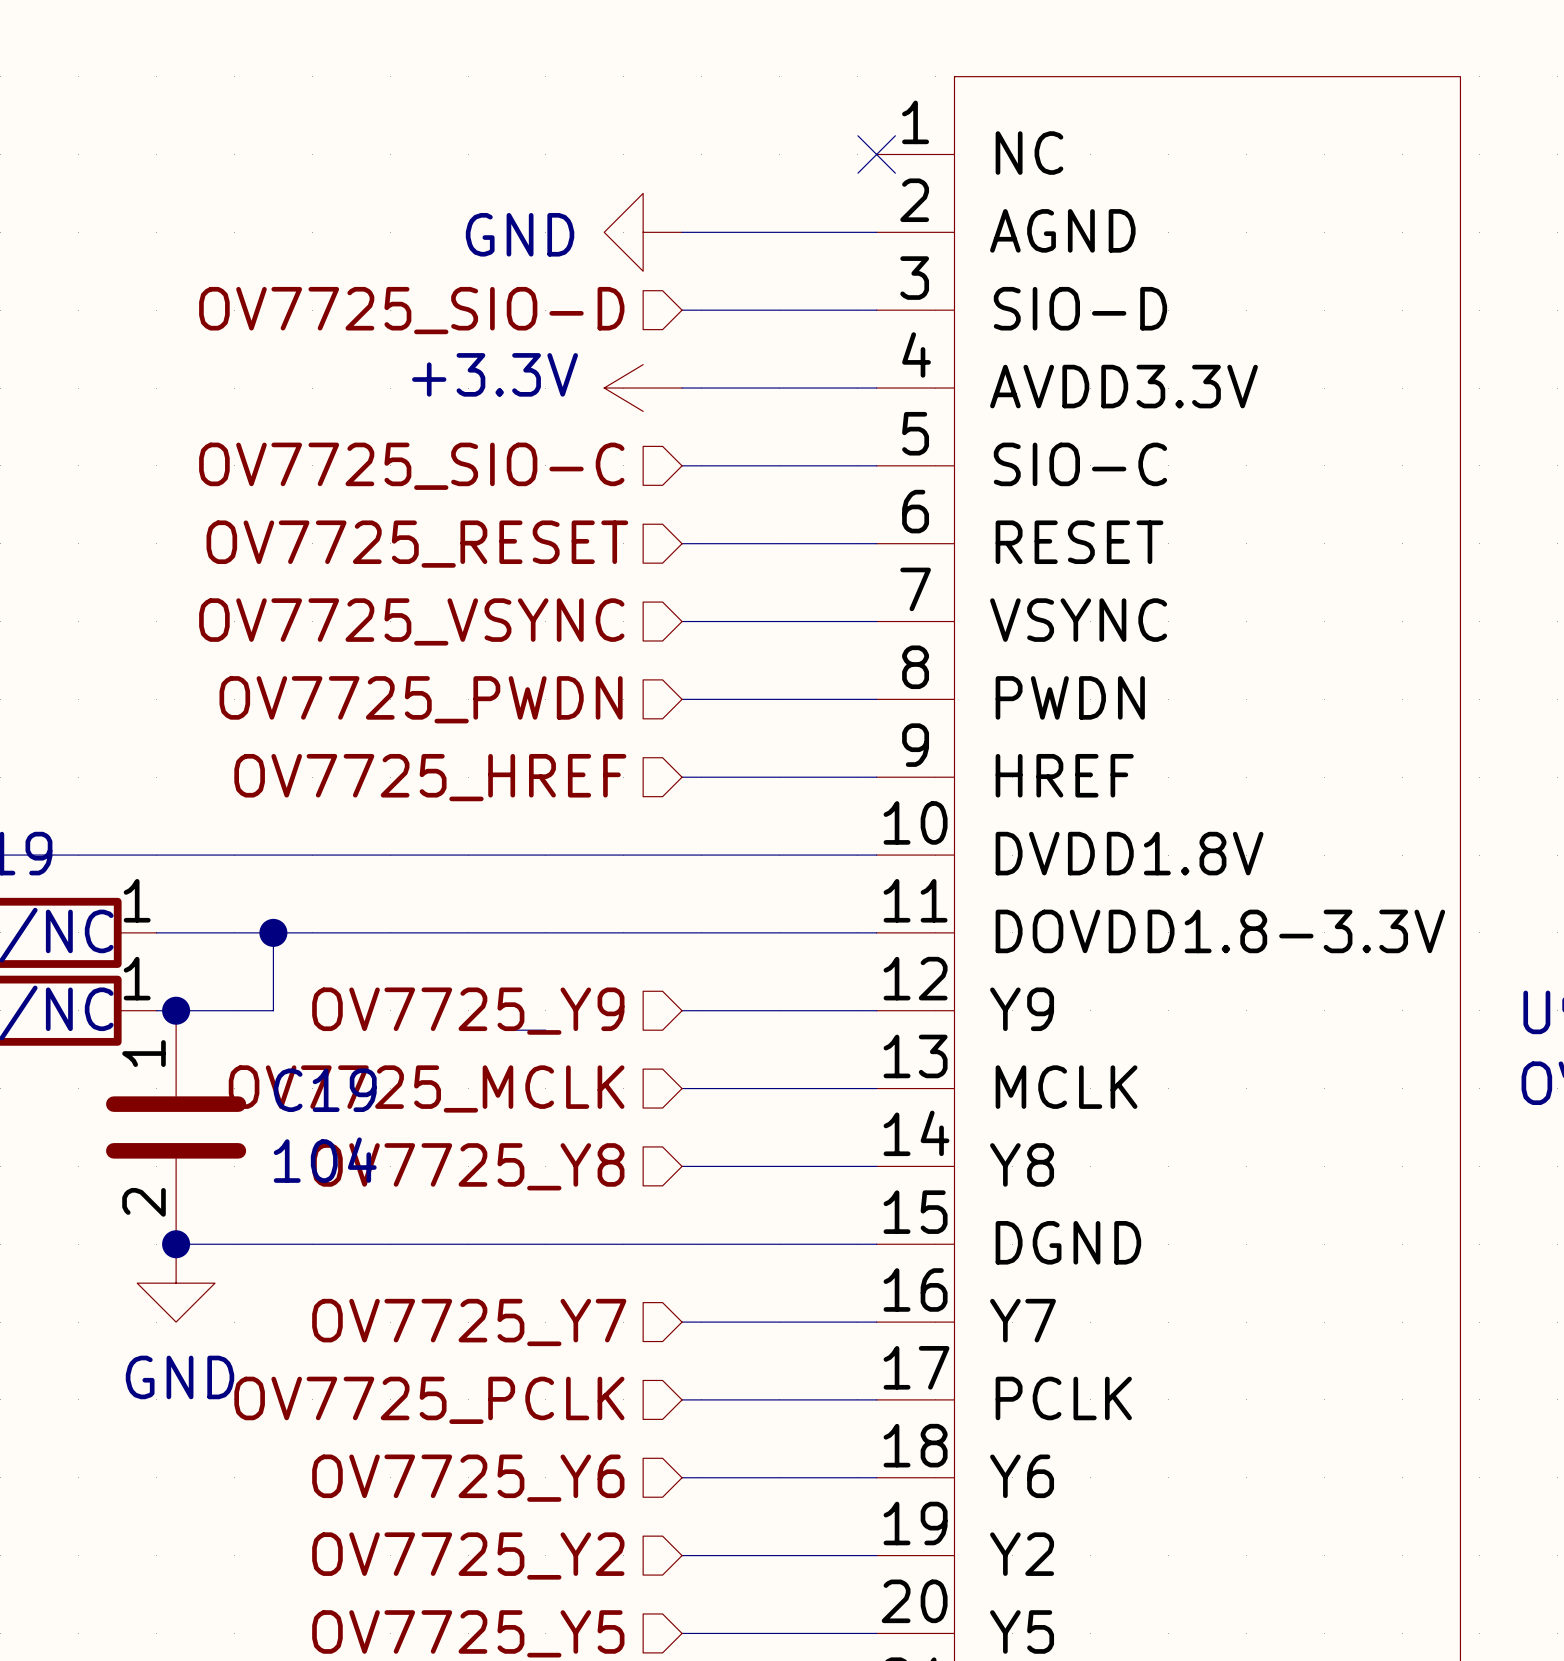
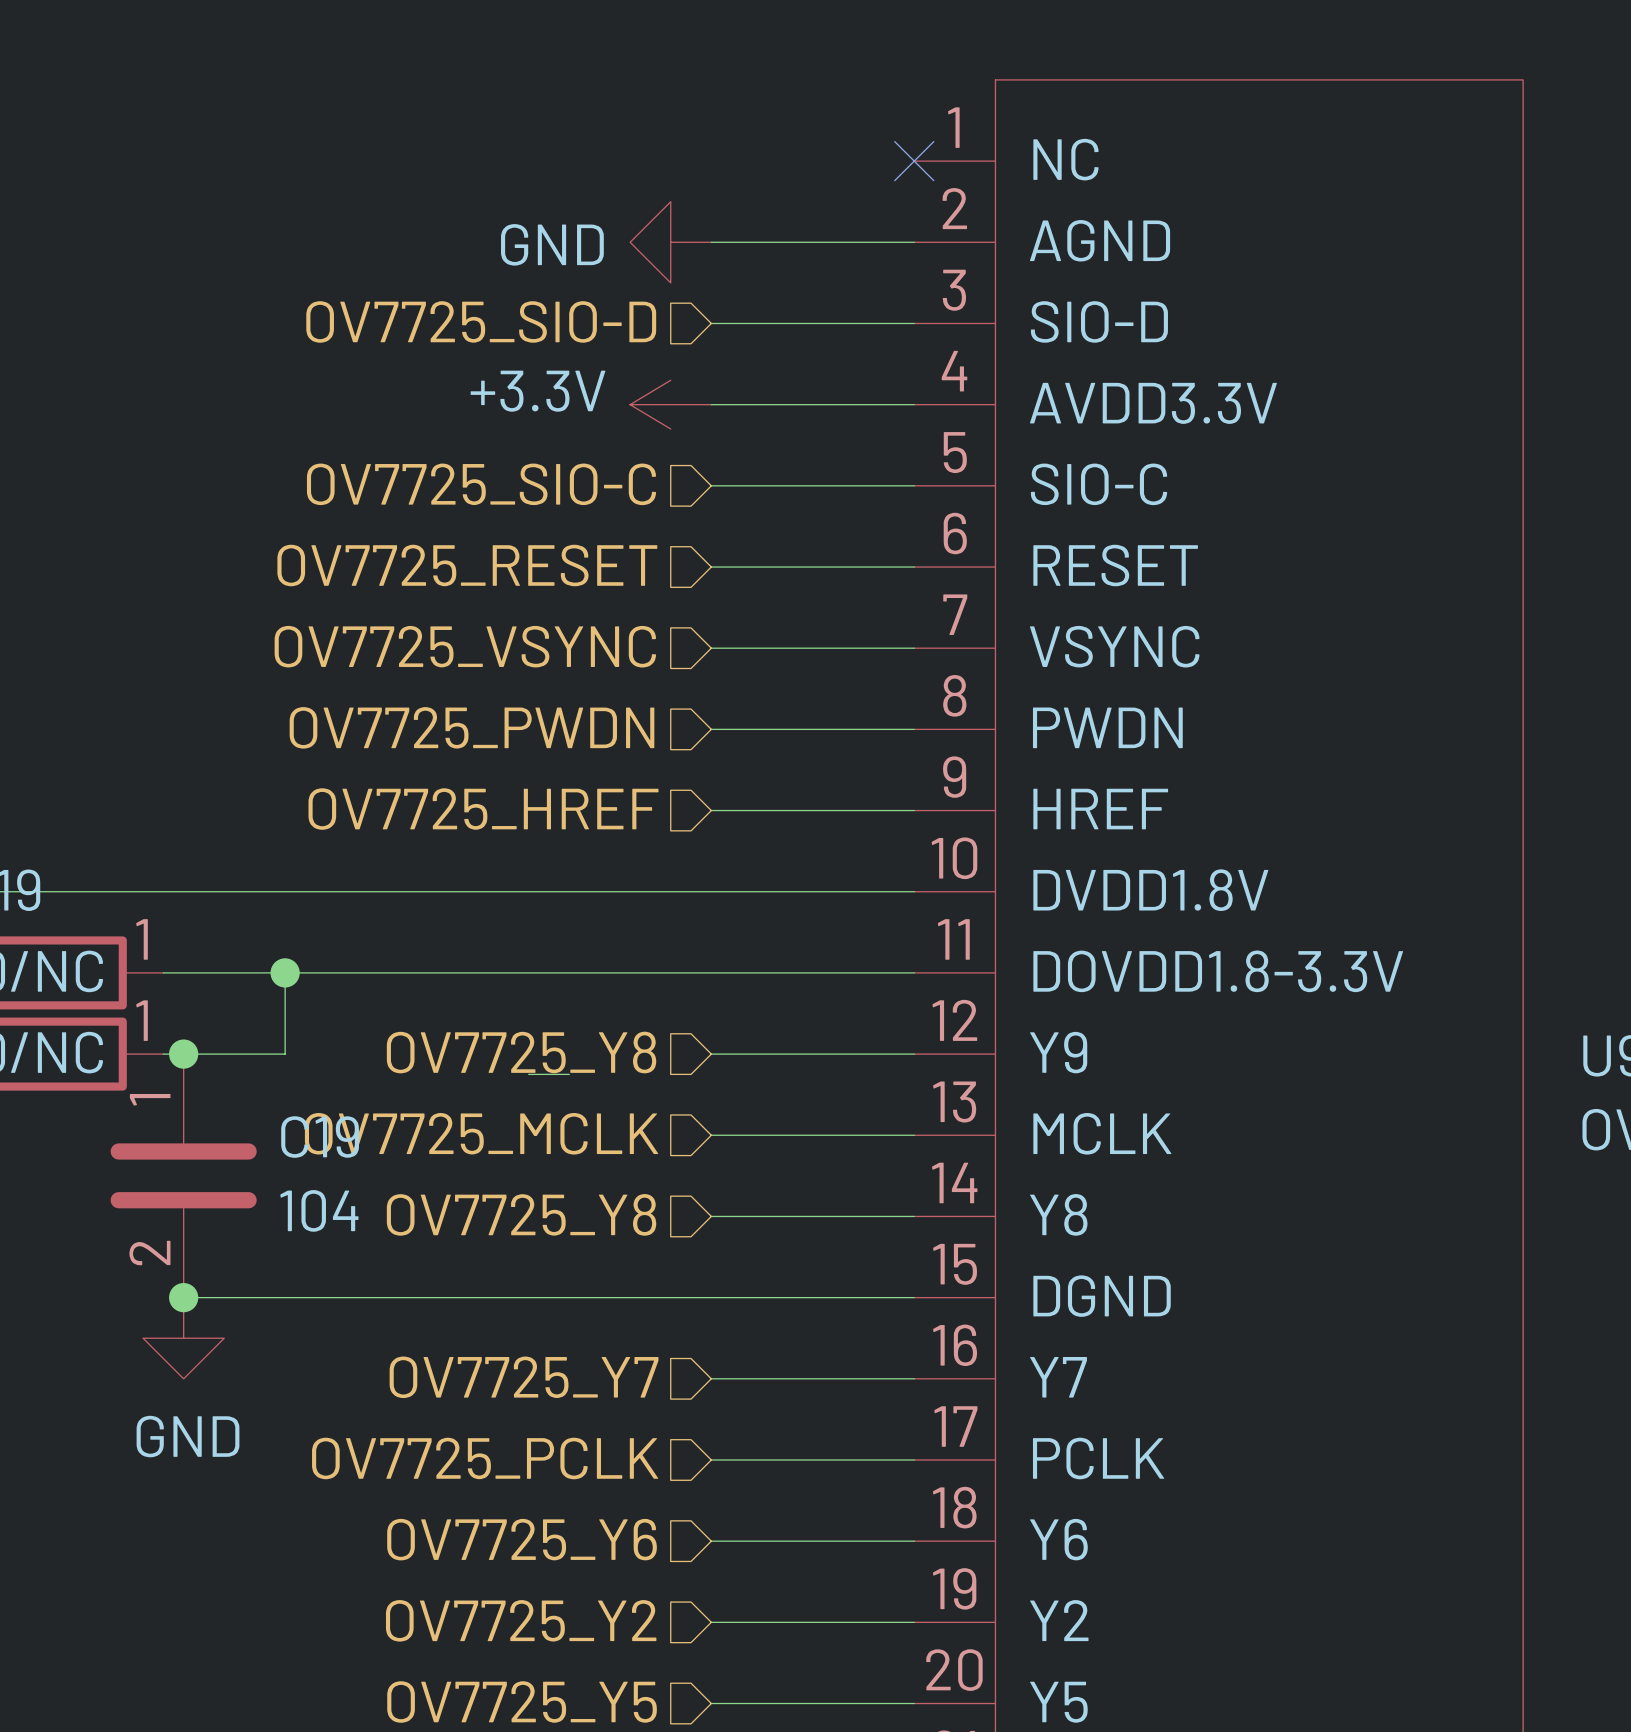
hierarchical label: OV7725_Y9 (468, 1011) -> OV7725_Y8 (521, 1052)

